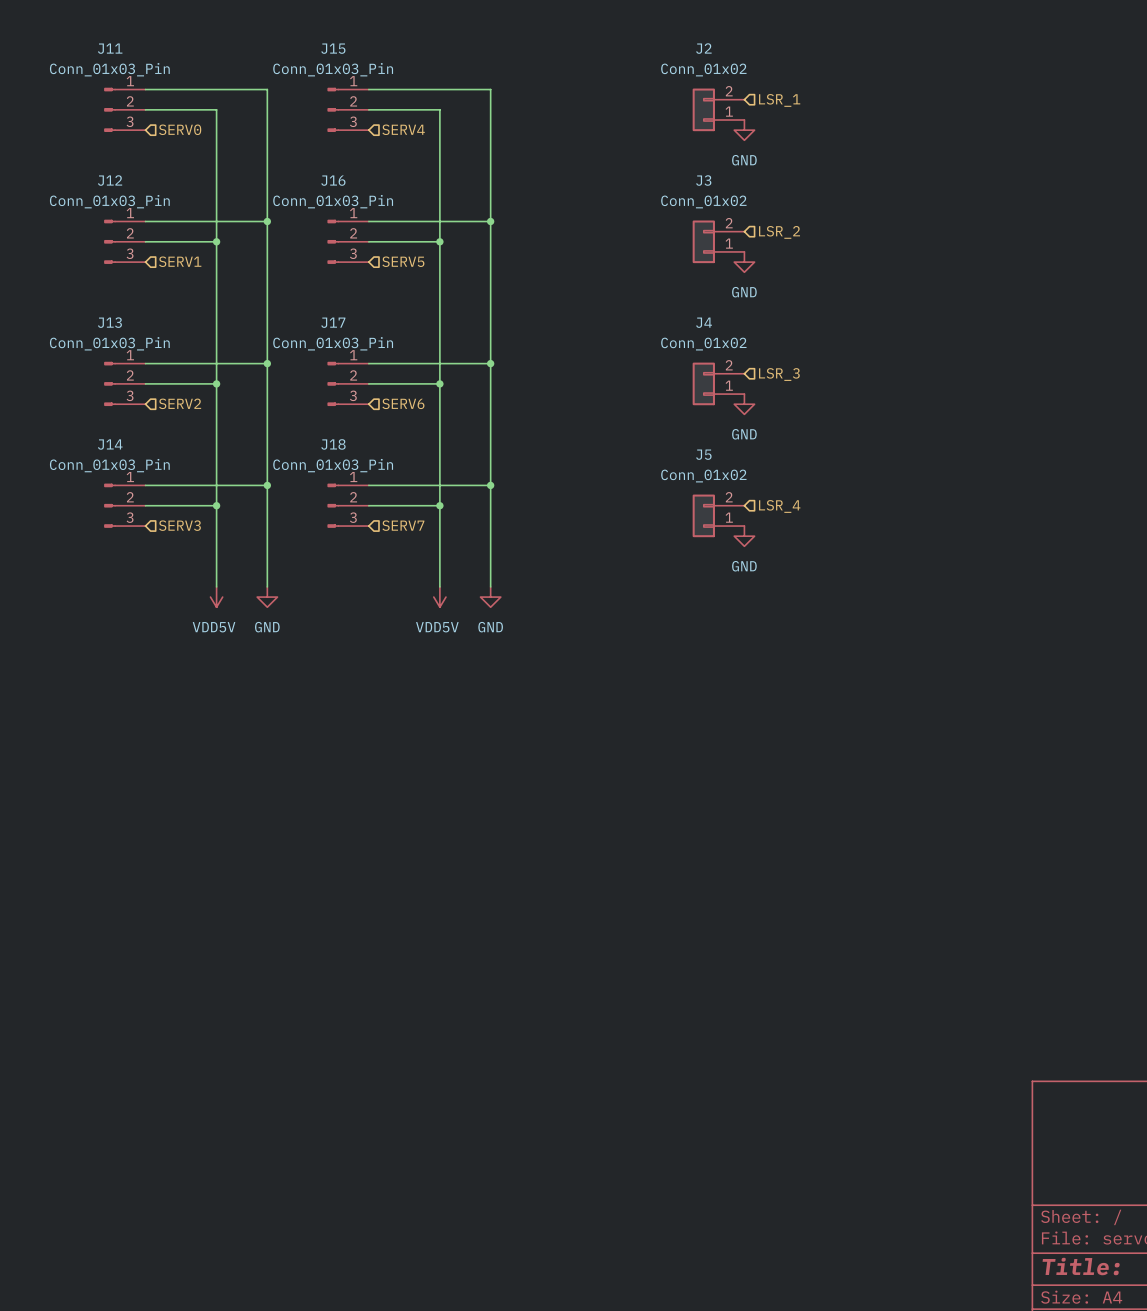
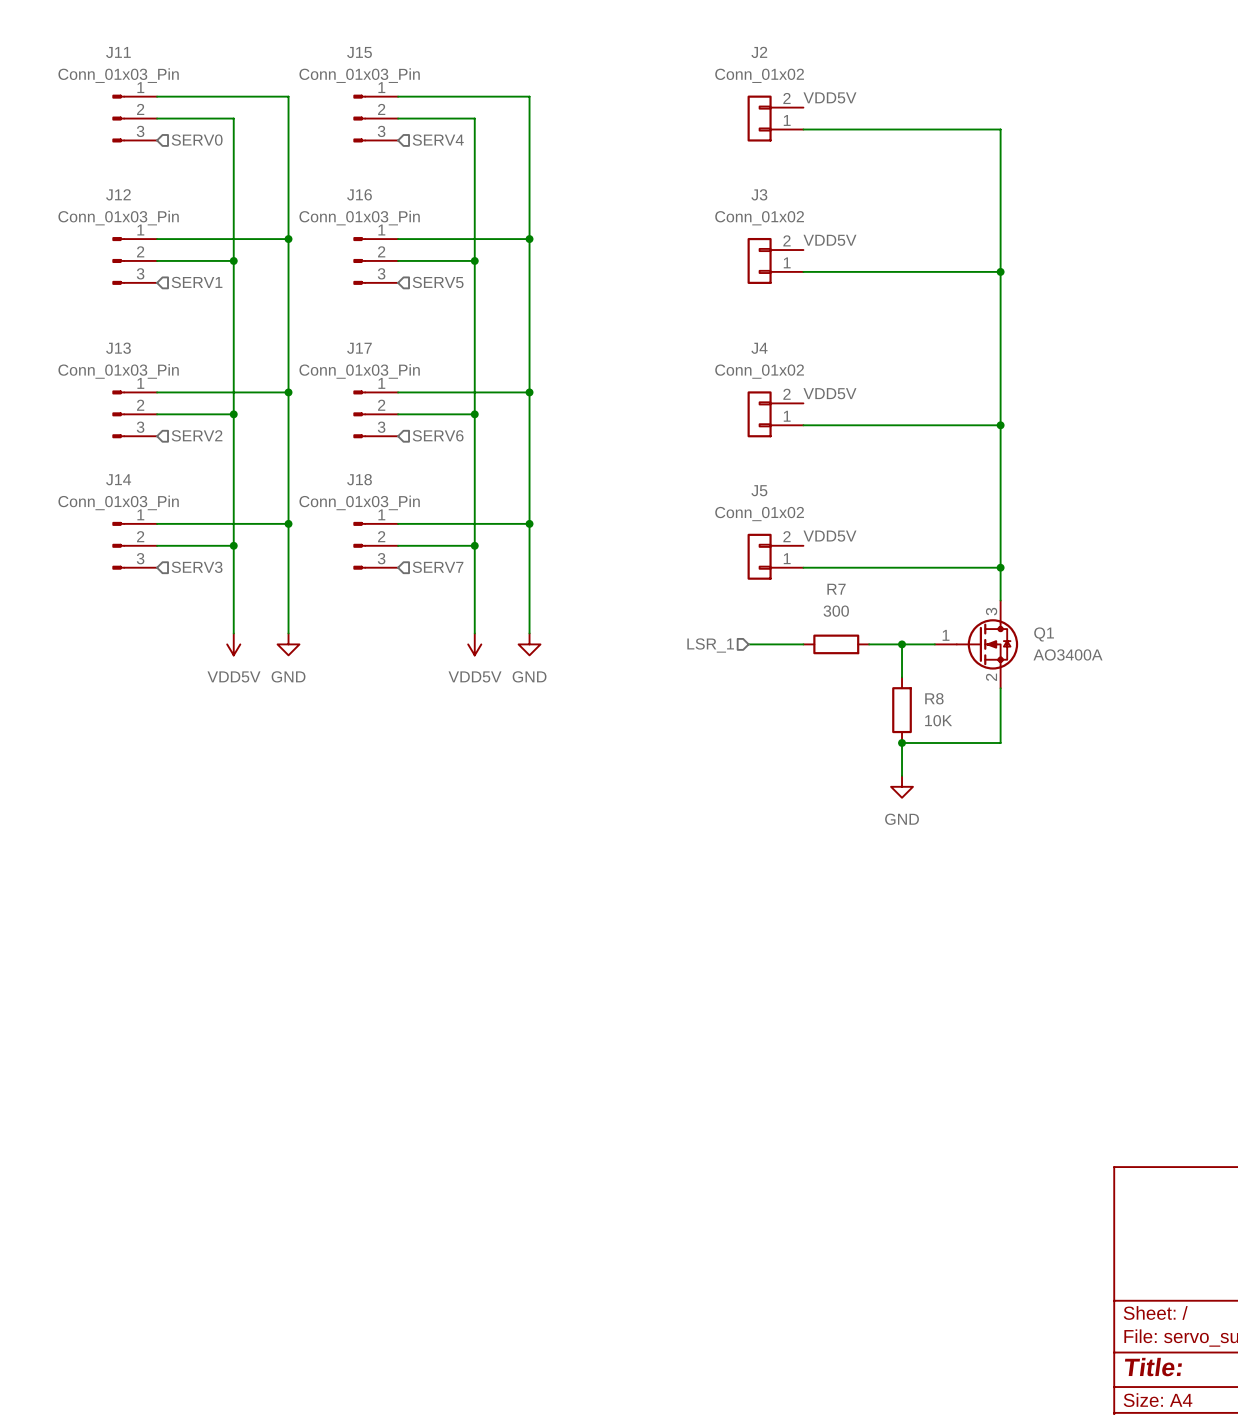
label: none -> VDD5V (829, 97)
hierarchical label: LSR_1 (779, 100) -> none
wire: none -> (803, 129) (1000, 129) (1000, 600)
power symbol: GND (744, 130) -> none
label: none -> VDD5V (829, 240)
hierarchical label: LSR_2 (779, 232) -> none
wire: none -> (803, 271) (1000, 271)
junction: none -> (1000, 271)
power symbol: GND (744, 262) -> none
label: none -> VDD5V (829, 393)
hierarchical label: LSR_3 (779, 374) -> none
wire: none -> (803, 425) (1000, 425)
junction: none -> (1000, 425)
power symbol: GND (744, 404) -> none
label: none -> VDD5V (829, 536)
hierarchical label: LSR_4 (779, 506) -> none
wire: none -> (803, 567) (1000, 567)
junction: none -> (1000, 567)
power symbol: GND (744, 536) -> none
hierarchical label: none -> LSR_1 (710, 645)
wire: none -> (748, 644) (803, 644)
R7: none -> 300 (836, 644)
wire: none -> (869, 644) (934, 644)
wire: none -> (902, 644) (902, 677)
junction: none -> (902, 644)
Q1: none -> AO3400A (976, 644)
wire: none -> (1000, 688) (1000, 743) (902, 743) (902, 775)
R8: none -> 10K (902, 710)
junction: none -> (902, 743)
power symbol: none -> GND (902, 786)

